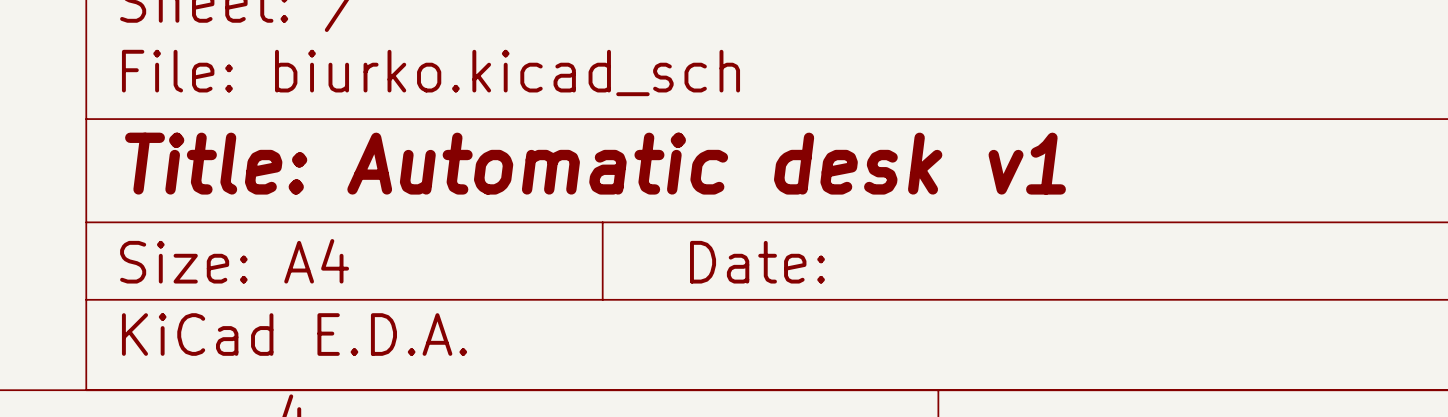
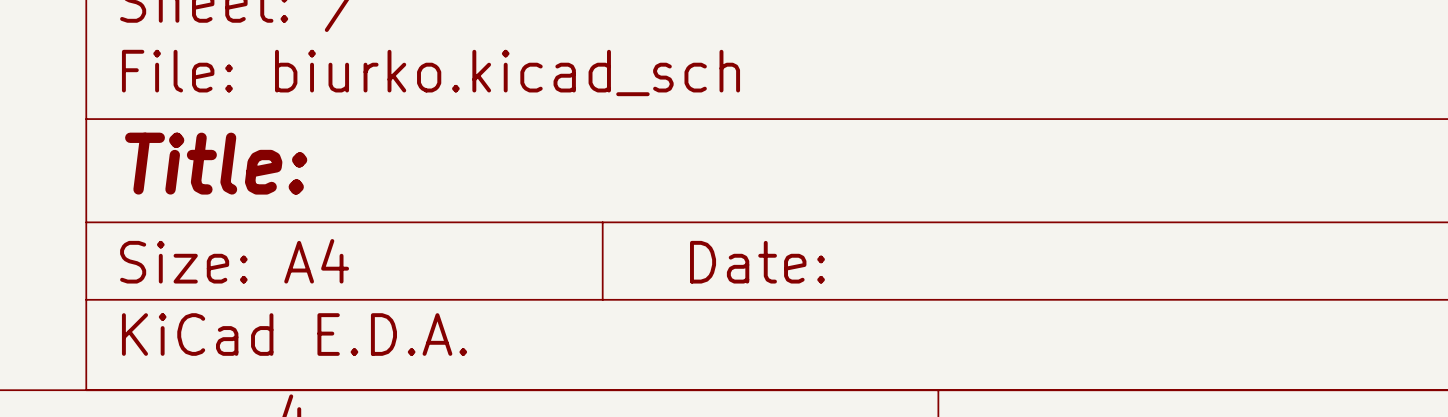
title block: Title: Automatic desk v1 (595, 163) -> Title: (216, 163)

